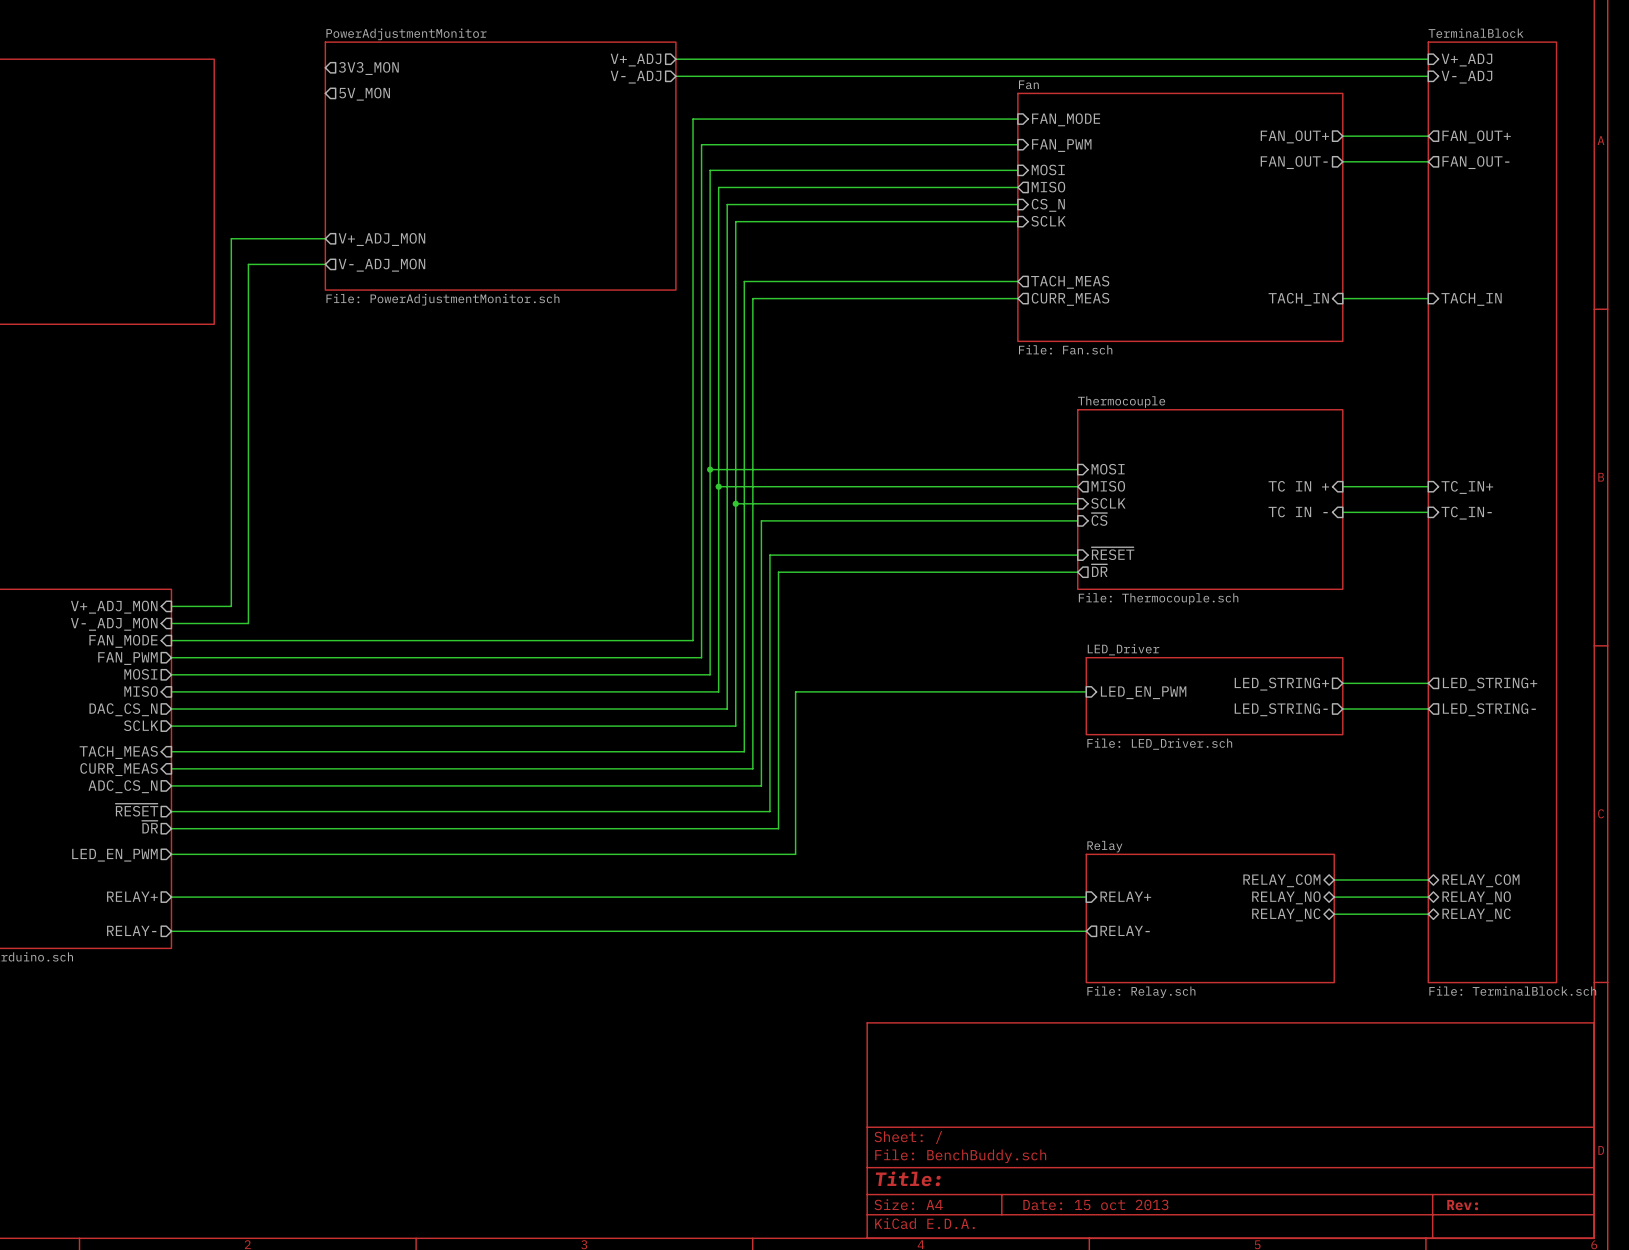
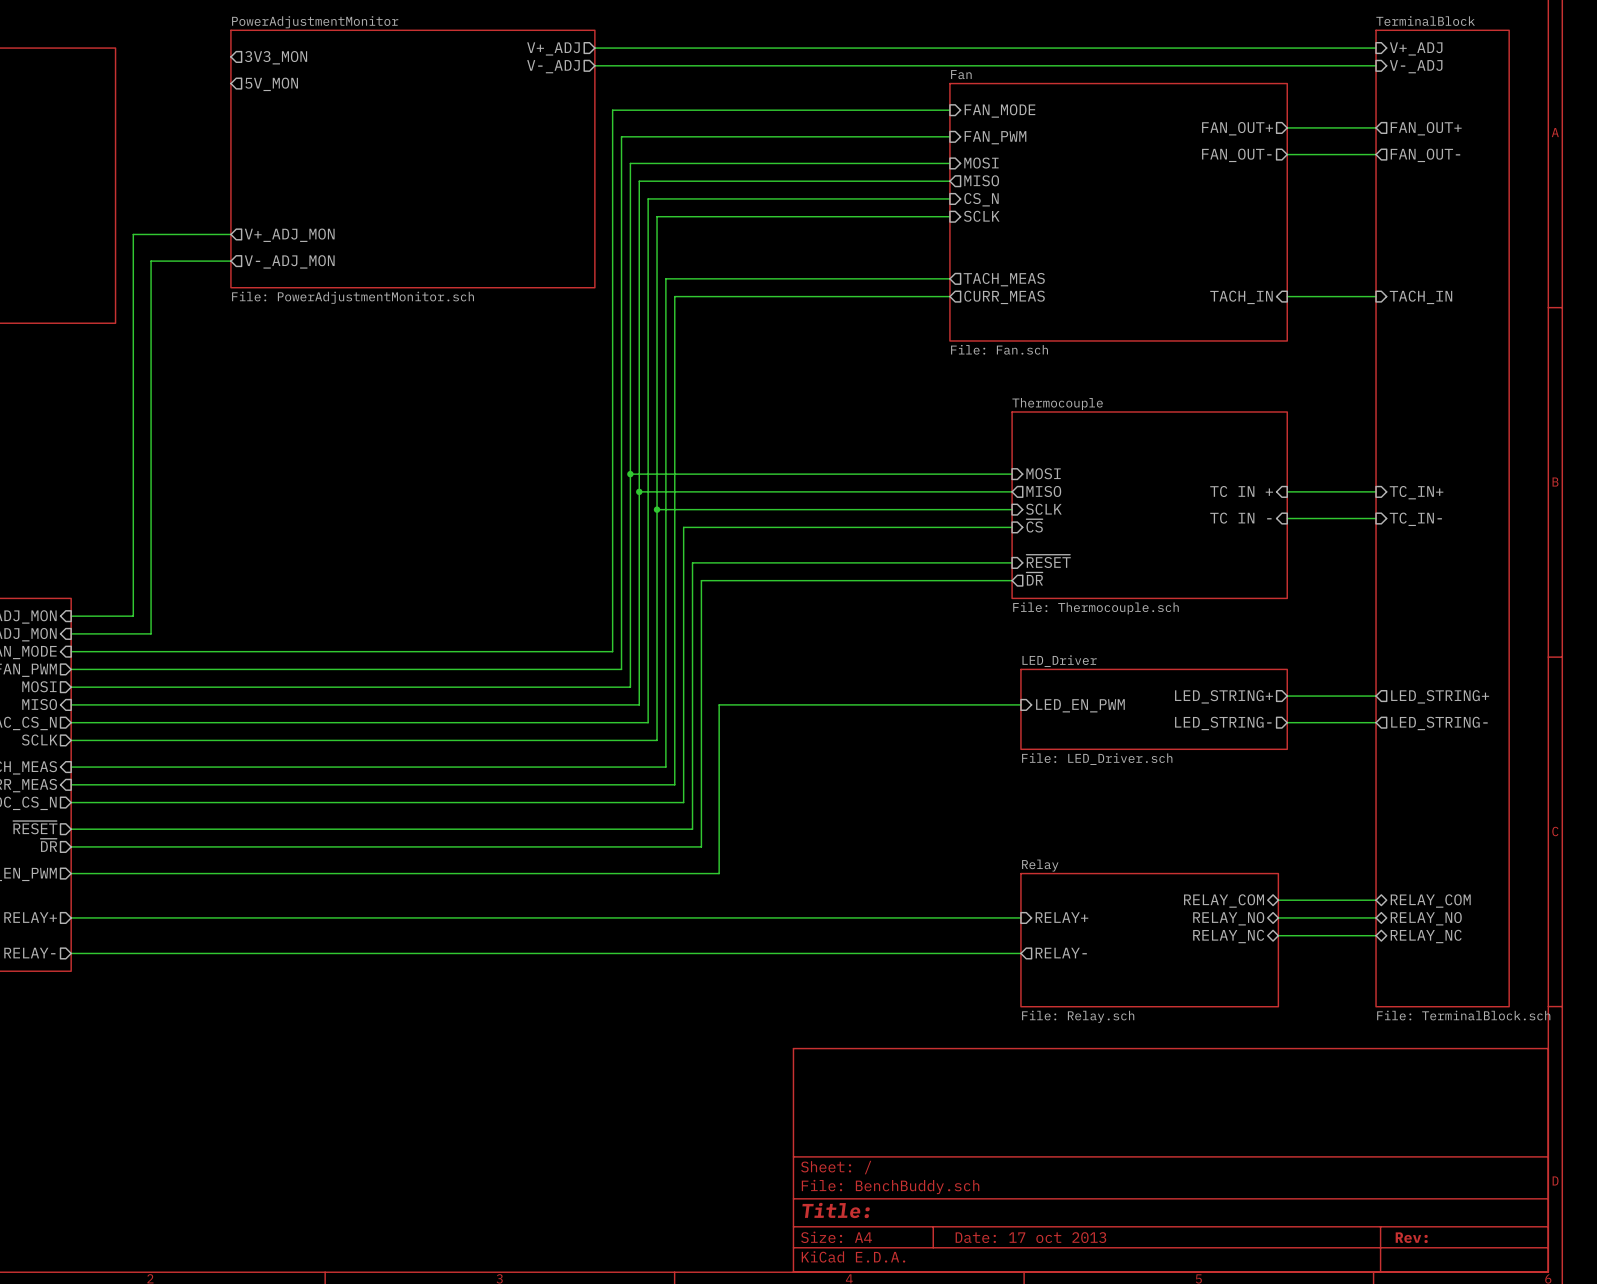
title block: Date: 15 oct 2013 (1095, 1204) -> Date: 17 oct 2013 (1030, 1237)

